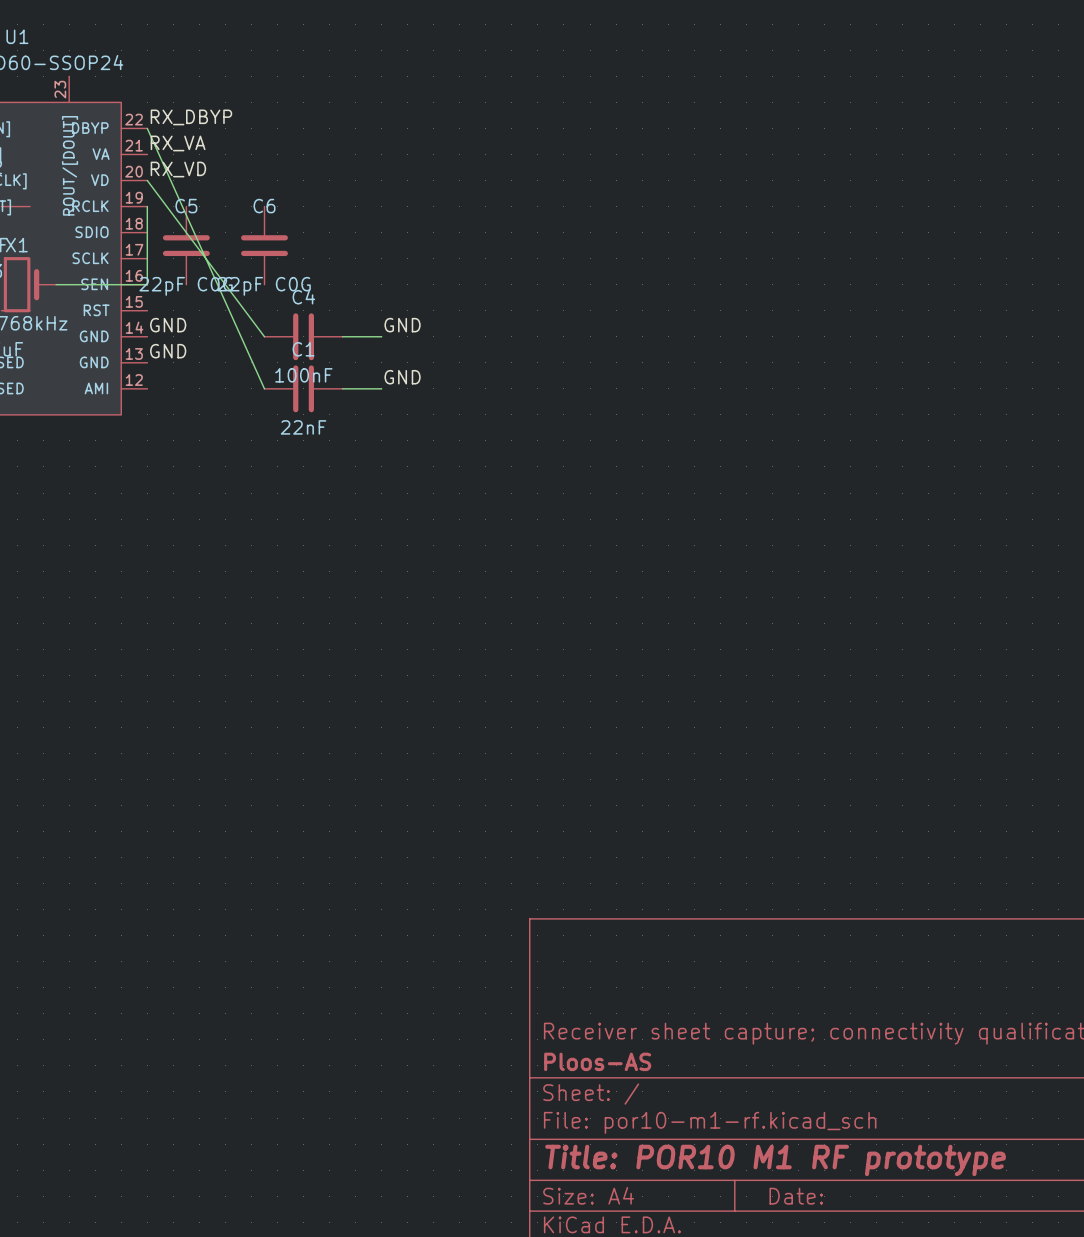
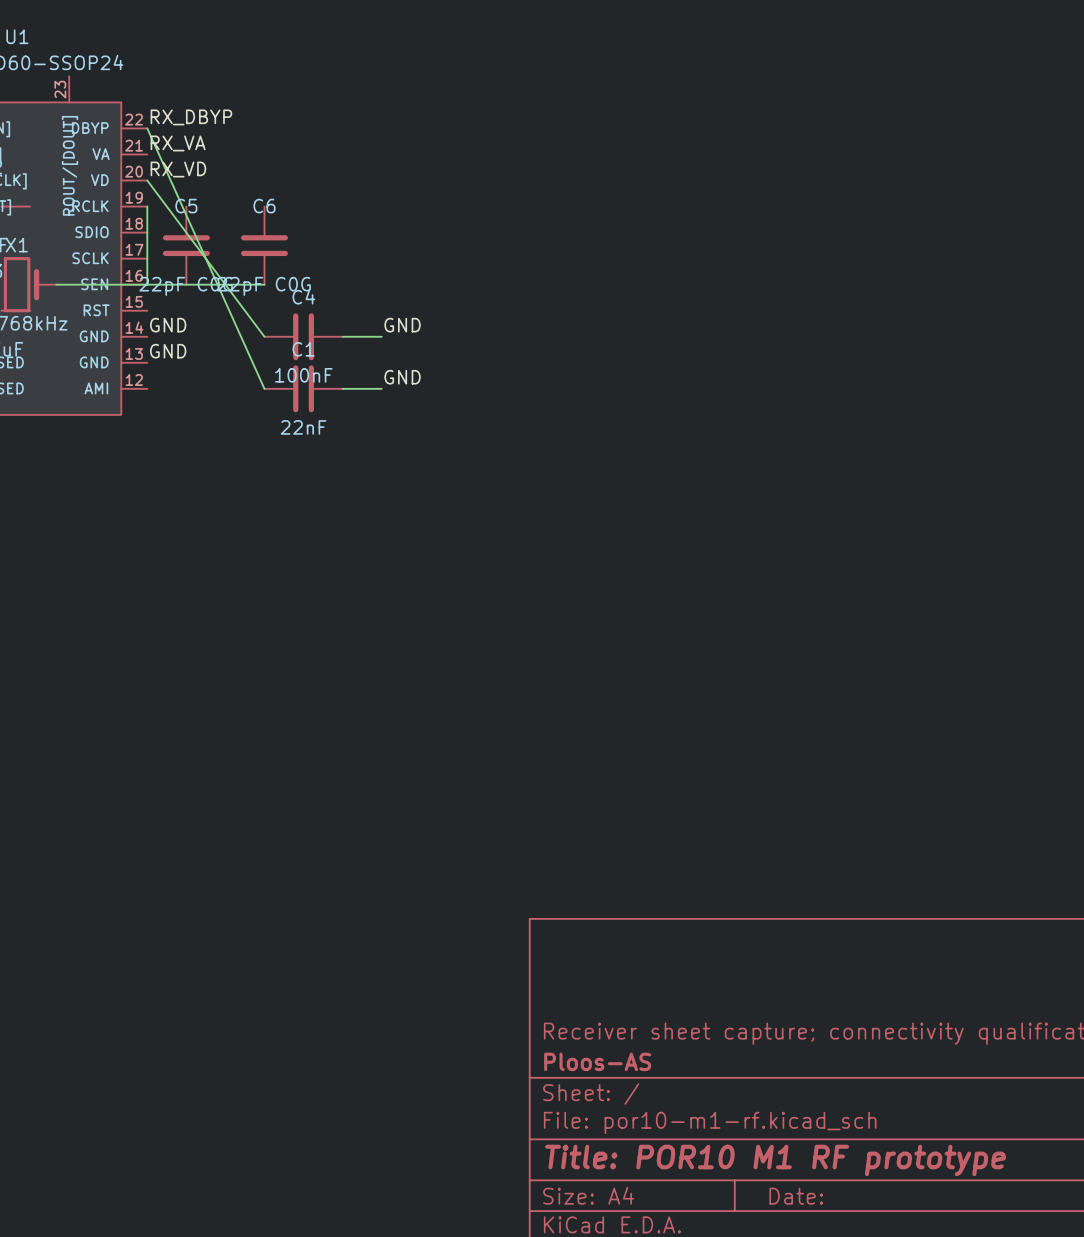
wire: none -> (147, 284) (264, 284)

